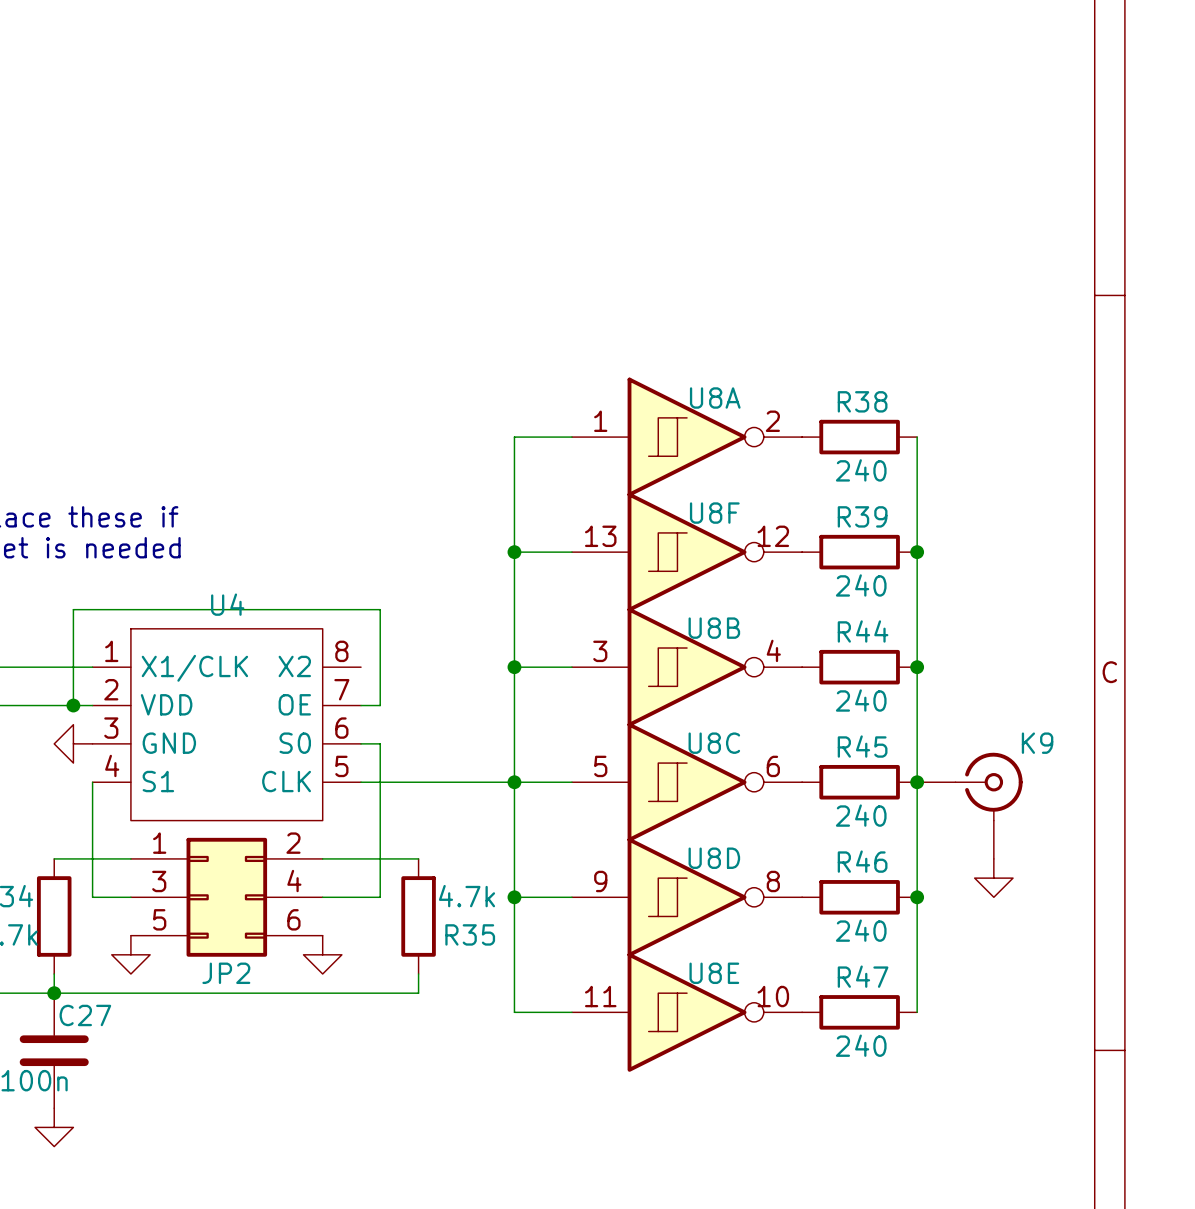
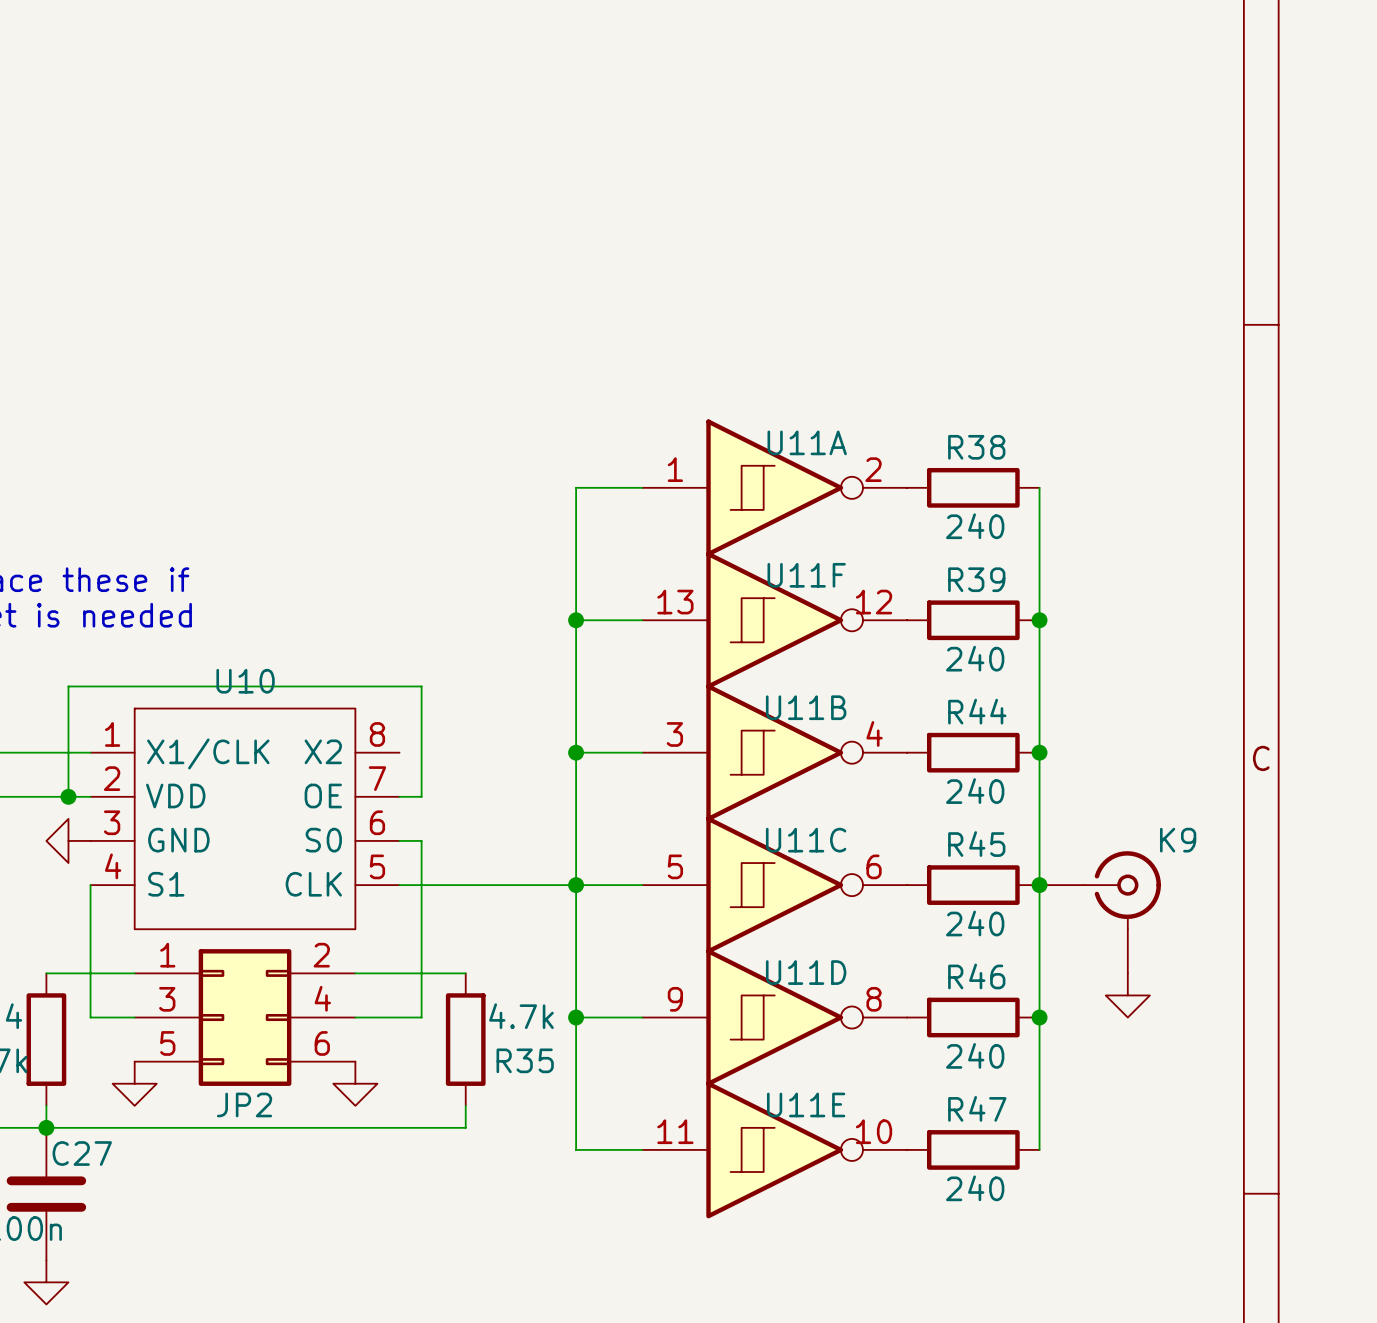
U8A name: U8A (715, 398) -> U11A (807, 442)
U8F name: U8F (714, 513) -> U11F (806, 575)
U4 name: U4 (227, 604) -> U10 (245, 681)
U8B name: U8B (714, 628) -> U11B (806, 707)
U8C name: U8C (714, 743) -> U11C (806, 840)
U8D name: U8D (714, 858) -> U11D (806, 972)
U8E name: U8E (714, 973) -> U11E (806, 1104)

